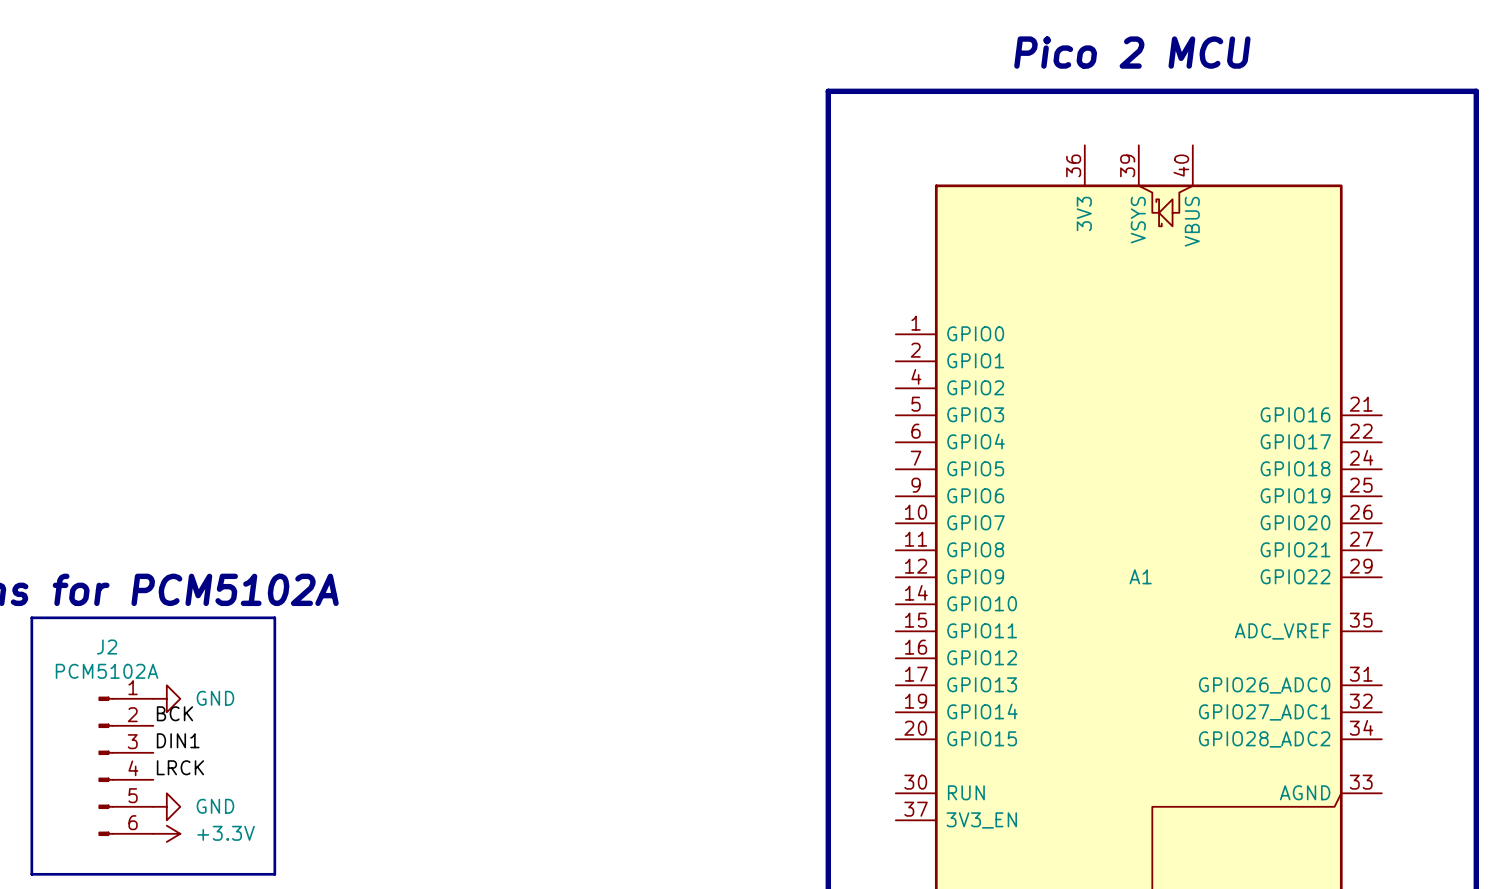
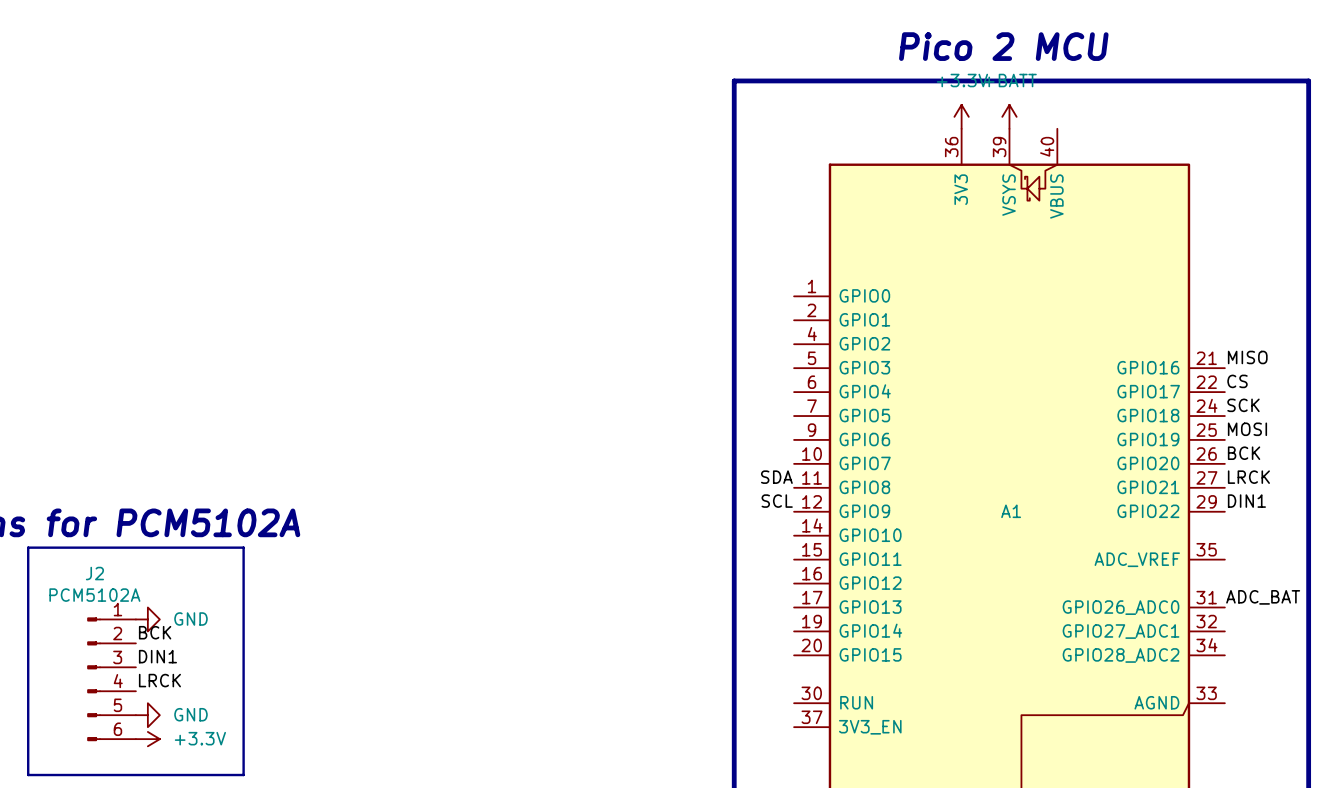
power symbol: none -> +3.3V (961, 116)
power symbol: none -> +BATT (1009, 116)
label: none -> MISO (1247, 357)
label: none -> CS (1237, 381)
label: none -> SCK (1243, 405)
label: none -> MOSI (1247, 429)
label: none -> BCK (1244, 453)
label: none -> SDA (776, 477)
label: none -> LRCK (1248, 477)
label: none -> SCL (777, 501)
label: none -> DIN1 (1246, 501)
label: none -> ADC_BAT (1263, 597)

